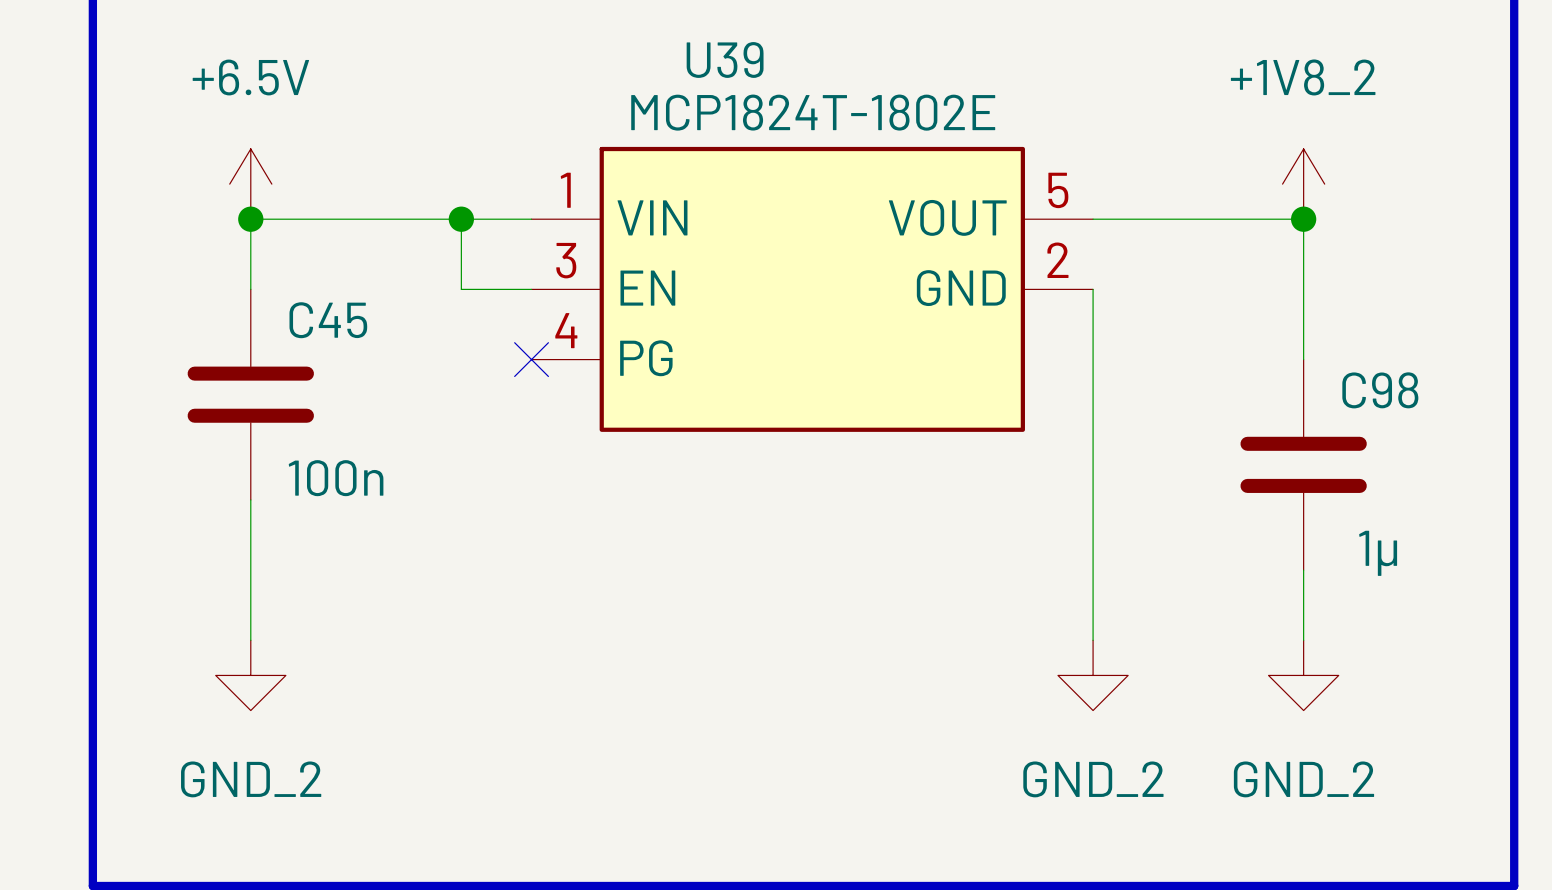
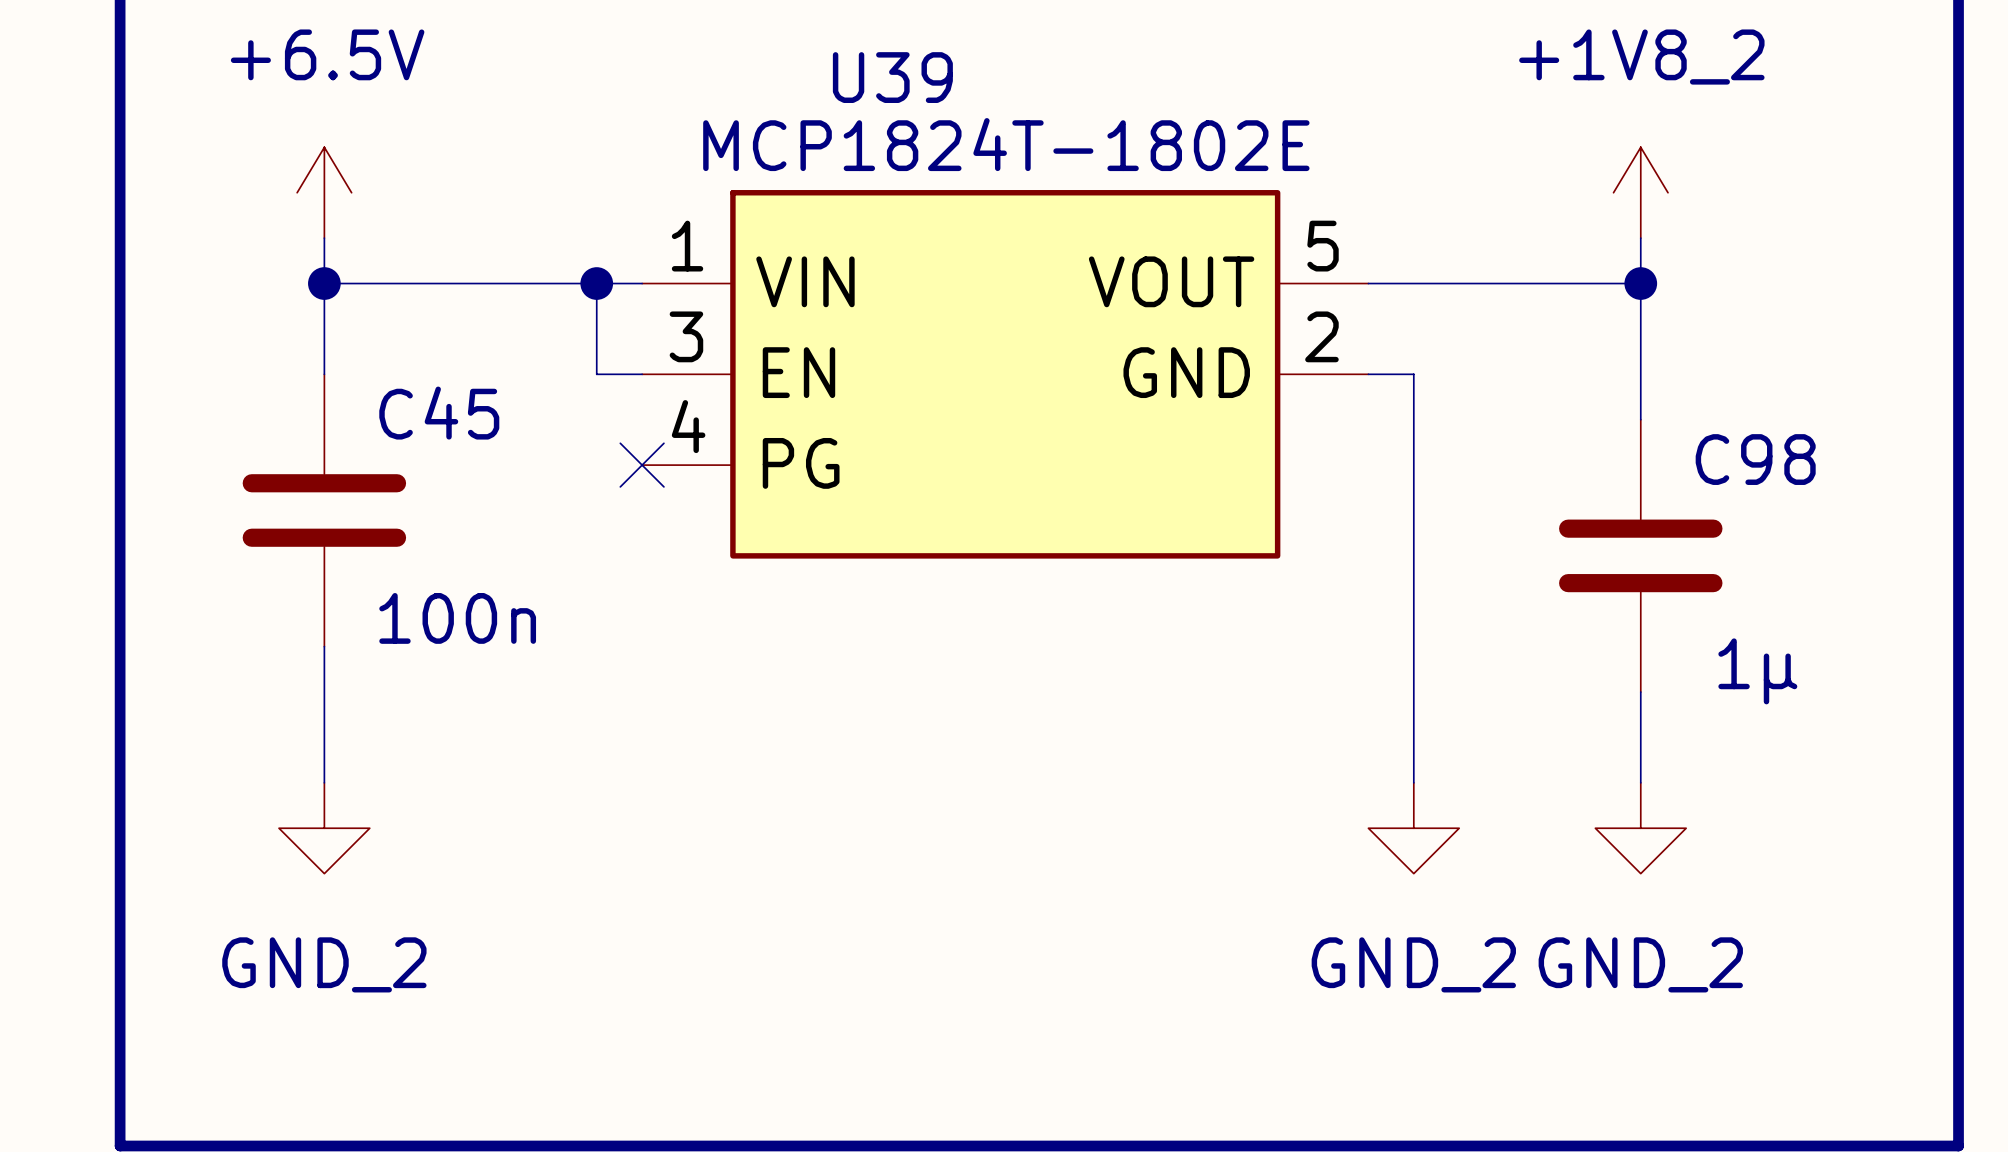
power symbol position: +6.5V (250, 184) -> +6.5V (324, 192)
wire: none -> (1640, 238) (1640, 419)
power symbol position: +1V8_2 (1303, 184) -> +1V8_2 (1640, 192)
wire: (1268, 219) (1303, 219) (1303, 359) -> none
junction position: (1303, 219) -> (1640, 283)
U39 position: (812, 289) -> (1005, 374)
no-connect mark position: (531, 359) -> (642, 465)
C98 position: (1303, 464) -> (1640, 555)
wire: (1303, 570) (1303, 640) -> (1640, 692) (1640, 782)
power symbol position: GND_2 (250, 675) -> GND_2 (324, 828)
power symbol position: GND_2 (1093, 675) -> GND_2 (1413, 828)
power symbol position: GND_2 (1303, 675) -> GND_2 (1640, 828)

